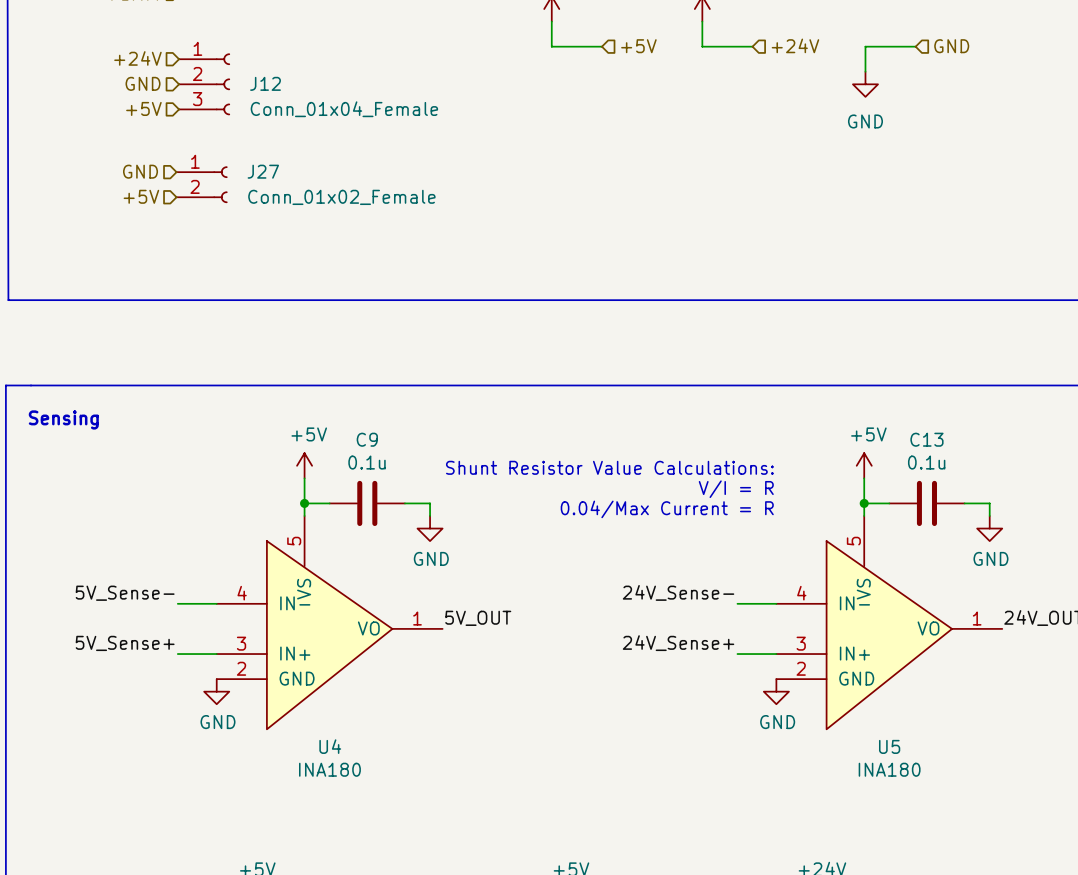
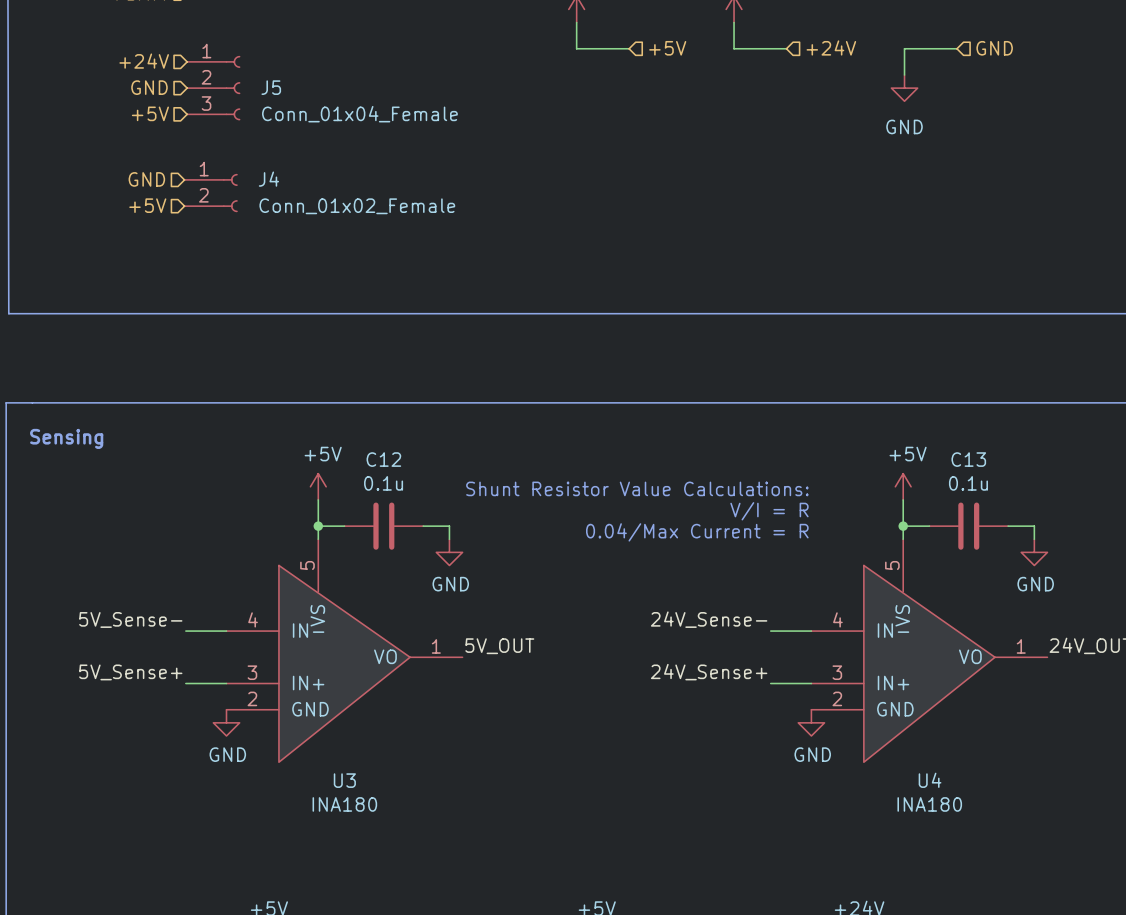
J12 name: J12 (265, 83) -> J5 (271, 87)
J27 name: J27 (263, 171) -> J4 (268, 179)
C9 name: C9 (367, 439) -> C12 (383, 459)
U4 name: U4 (330, 746) -> U3 (344, 780)
U5 name: U5 (889, 746) -> U4 (930, 780)

